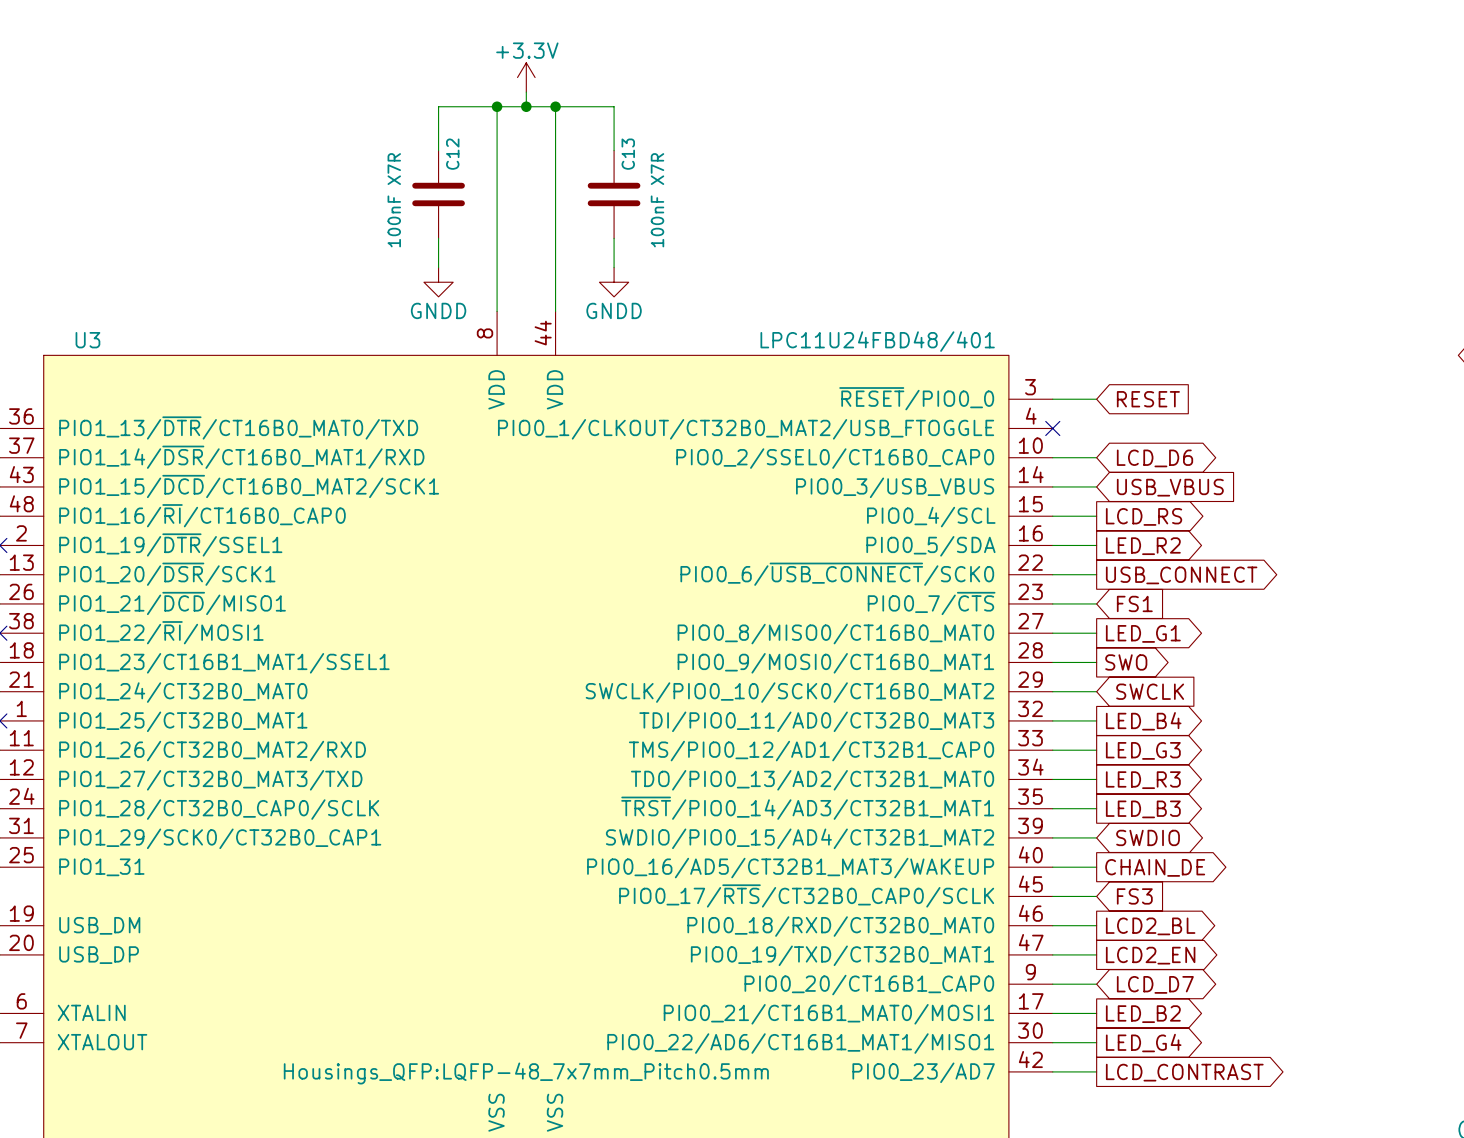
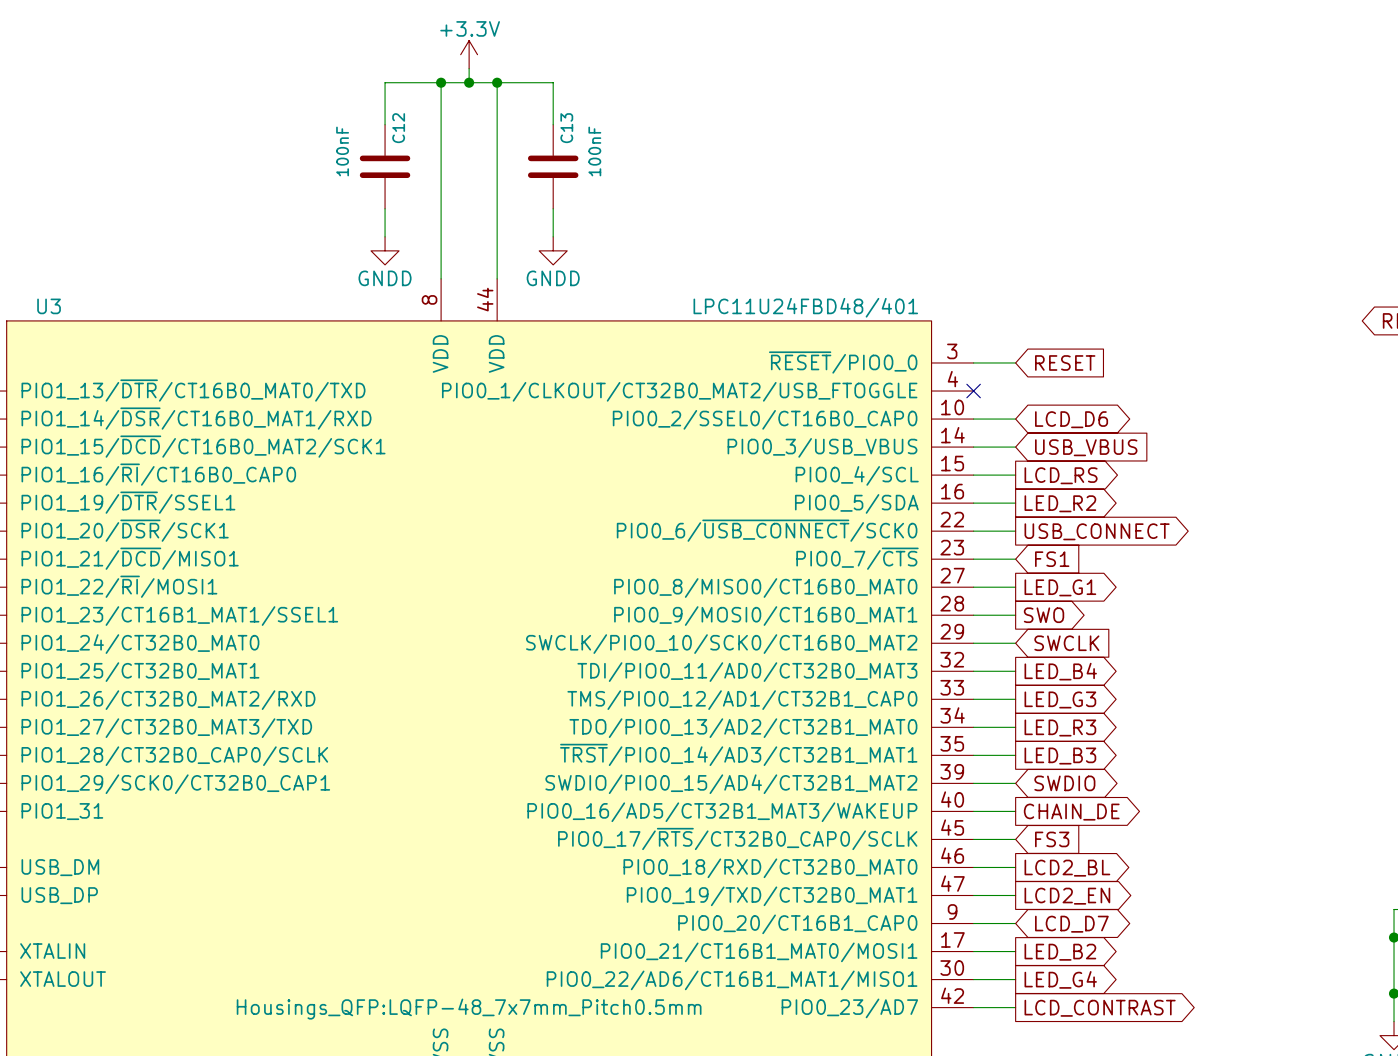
C12 value: 100nF X7R (394, 200) -> 100nF (342, 151)
C13 value: 100nF X7R (657, 200) -> 100nF (594, 151)

